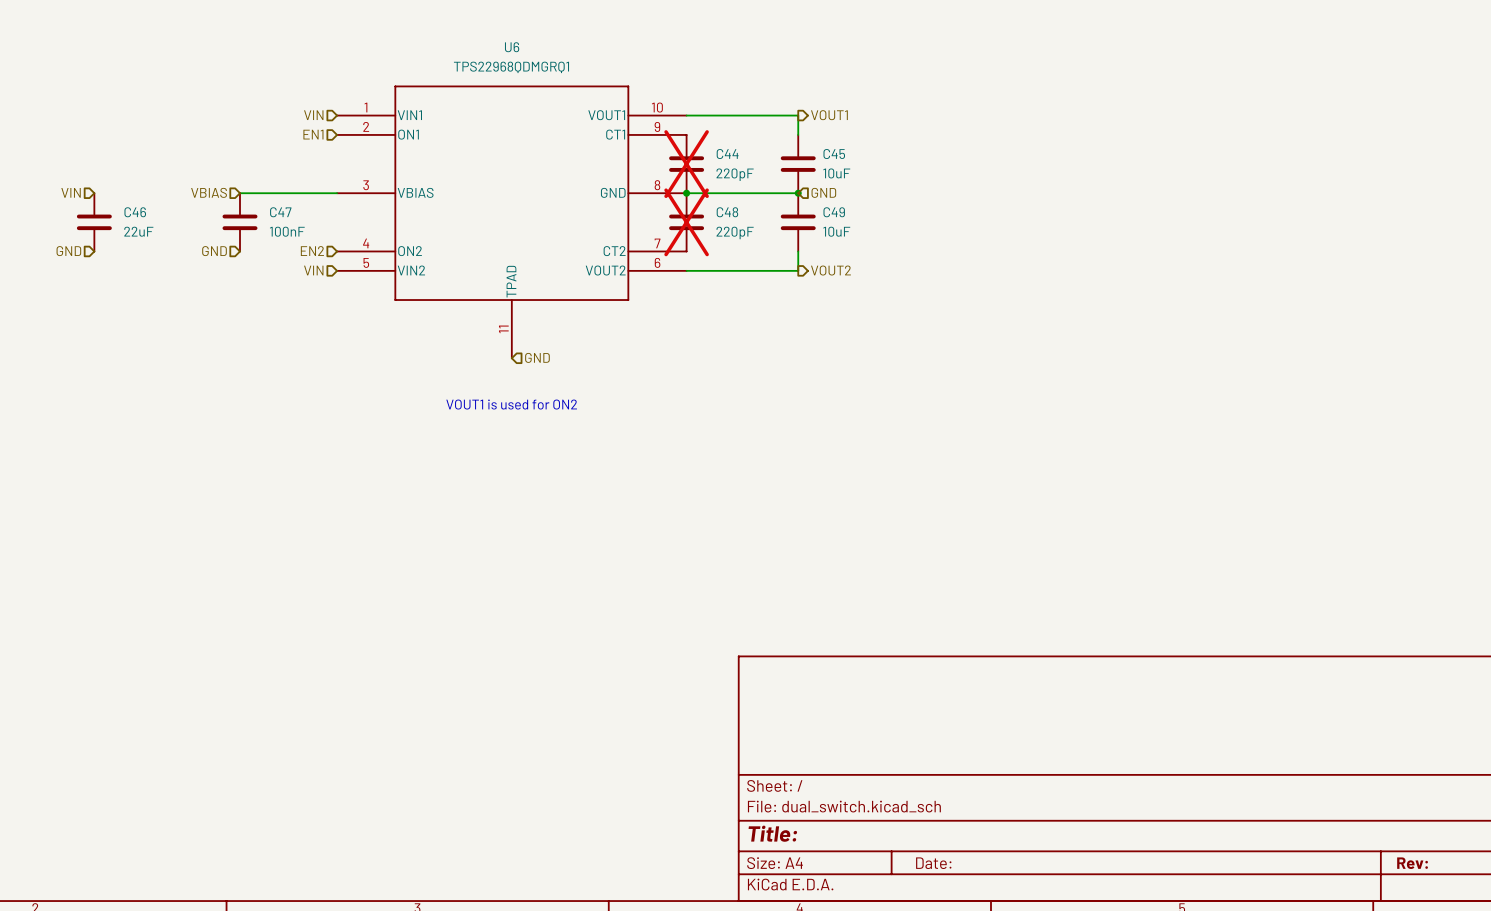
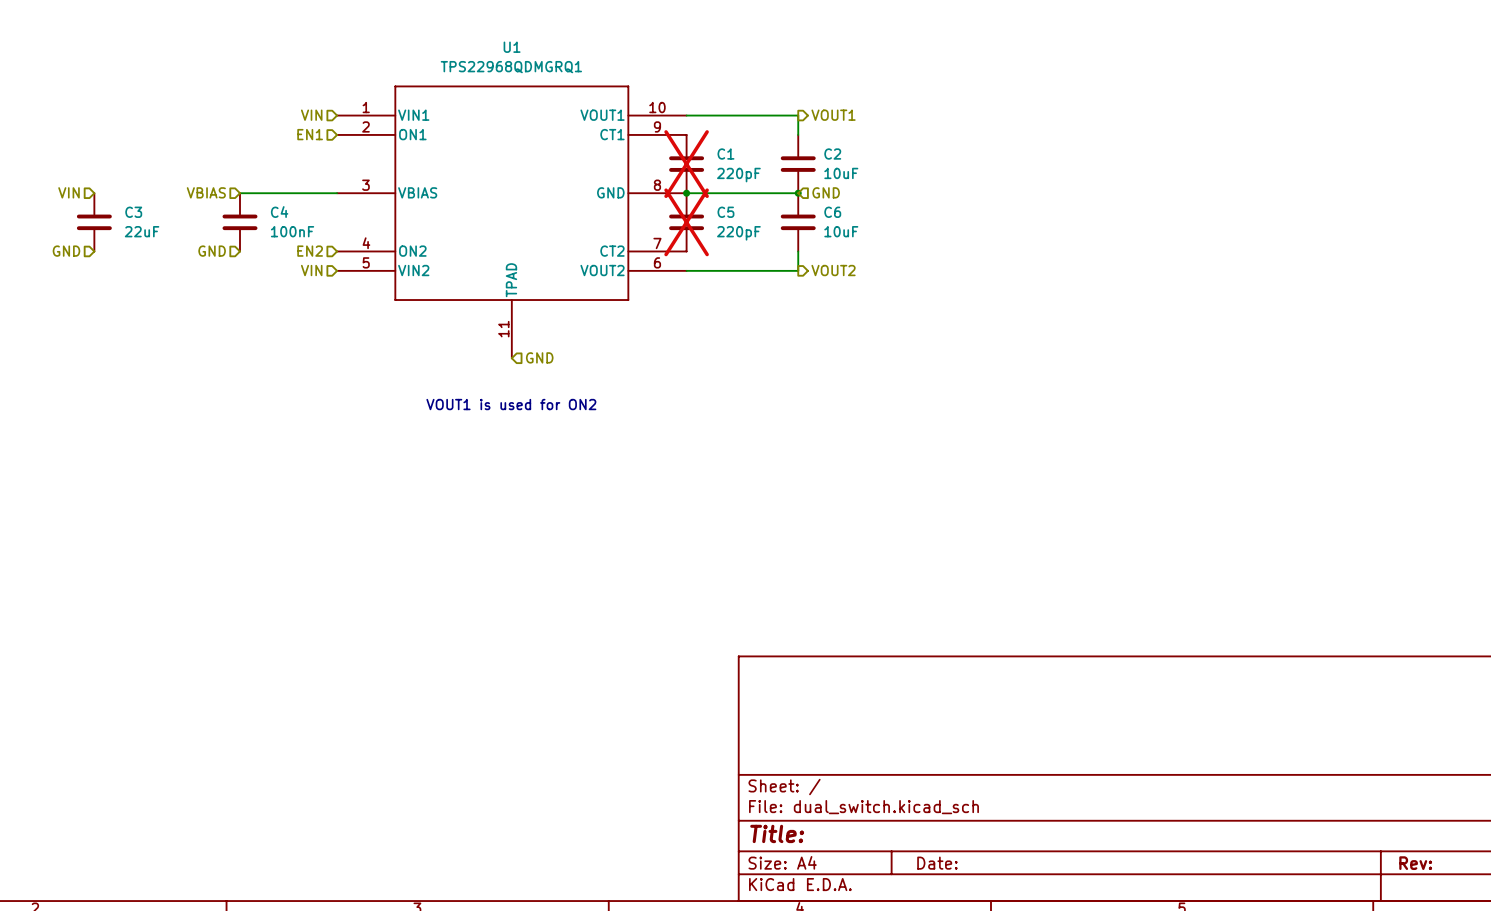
U6 name: U6 (512, 47) -> U1 (512, 47)
C44 name: C44 (727, 154) -> C1 (725, 154)
C45 name: C45 (834, 154) -> C2 (832, 154)
C46 name: C46 (135, 212) -> C3 (133, 212)
C47 name: C47 (280, 212) -> C4 (279, 212)
C48 name: C48 (727, 212) -> C5 (725, 212)
C49 name: C49 (834, 212) -> C6 (832, 212)

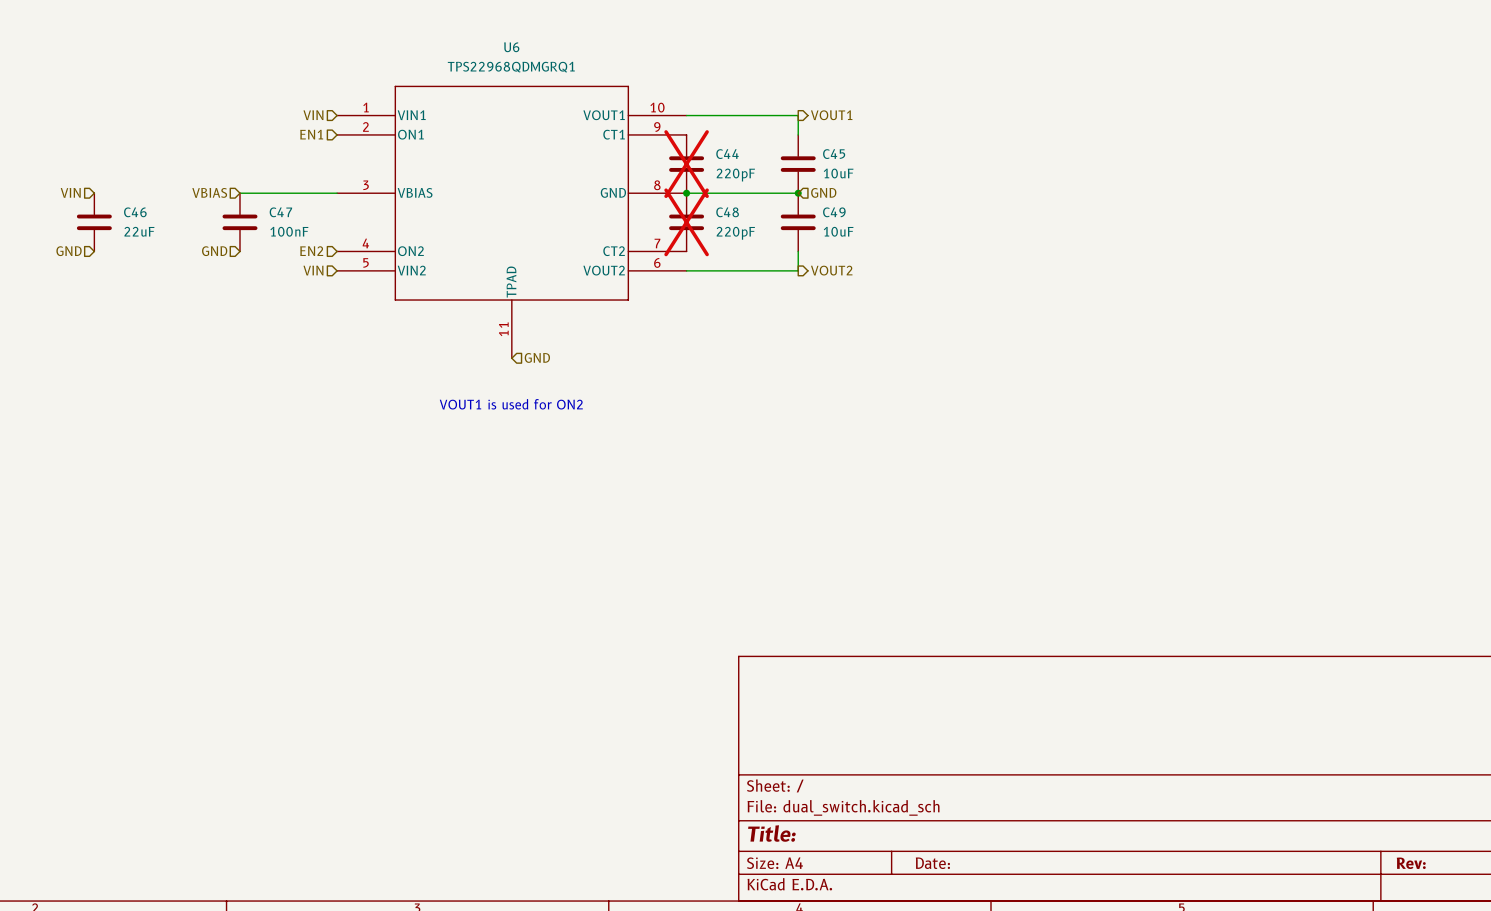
U1 name: U1 (512, 47) -> U6 (511, 47)
C1 name: C1 (725, 154) -> C44 (727, 154)
C2 name: C2 (832, 154) -> C45 (834, 154)
C3 name: C3 (133, 212) -> C46 (135, 212)
C4 name: C4 (279, 212) -> C47 (280, 212)
C5 name: C5 (725, 212) -> C48 (727, 212)
C6 name: C6 (832, 212) -> C49 (834, 212)

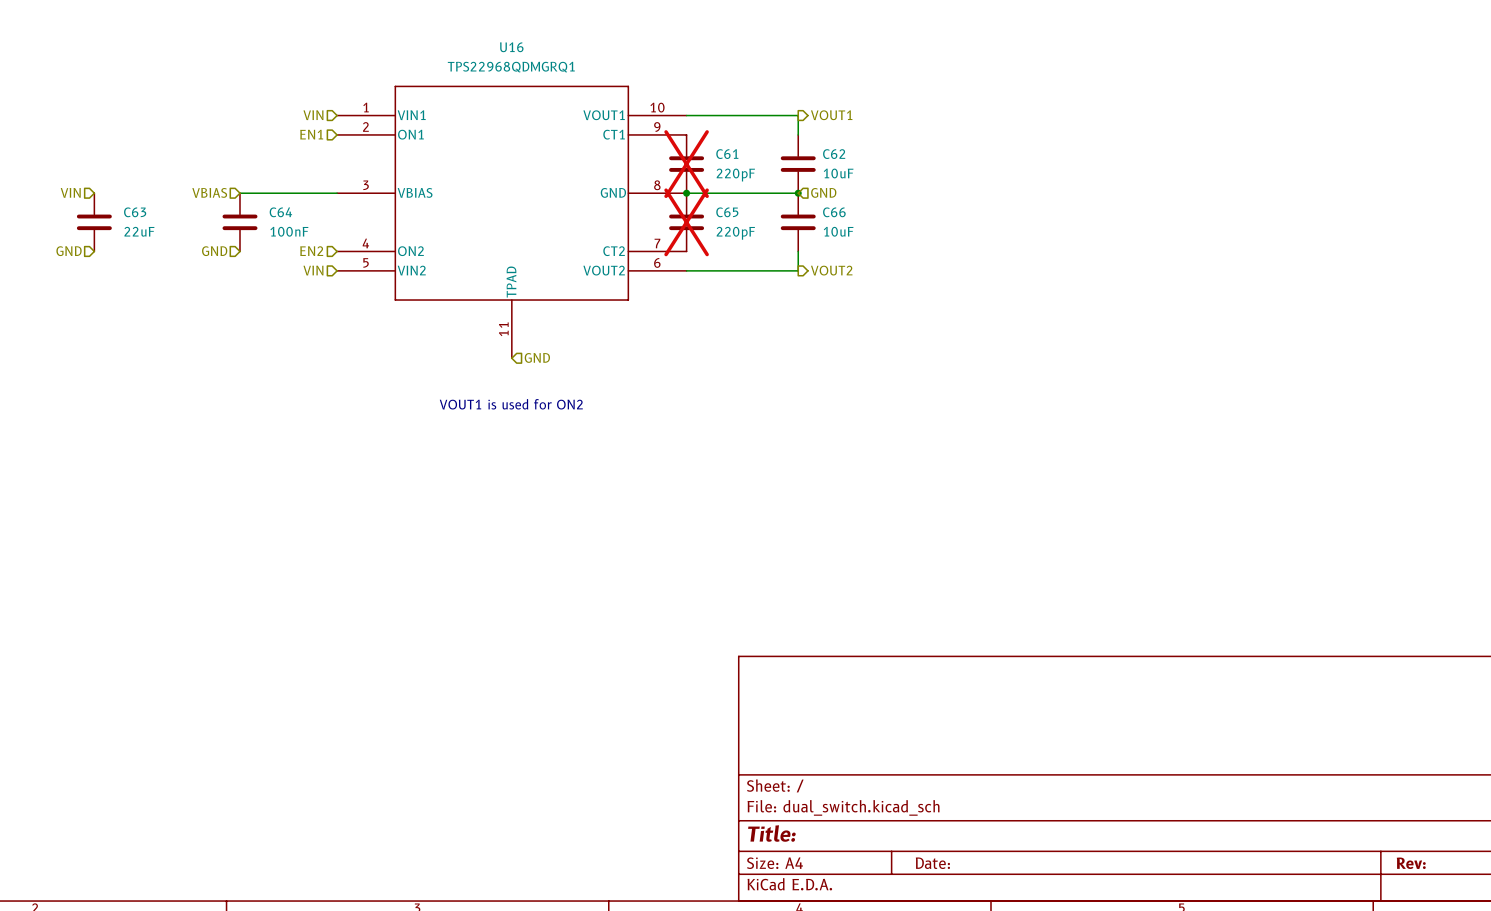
U6 name: U6 (511, 47) -> U16 (511, 47)
C44 name: C44 (727, 154) -> C61 (727, 154)
C45 name: C45 (834, 154) -> C62 (834, 154)
C46 name: C46 (135, 212) -> C63 (135, 212)
C47 name: C47 (280, 212) -> C64 (280, 212)
C48 name: C48 (727, 212) -> C65 (727, 212)
C49 name: C49 (834, 212) -> C66 (834, 212)

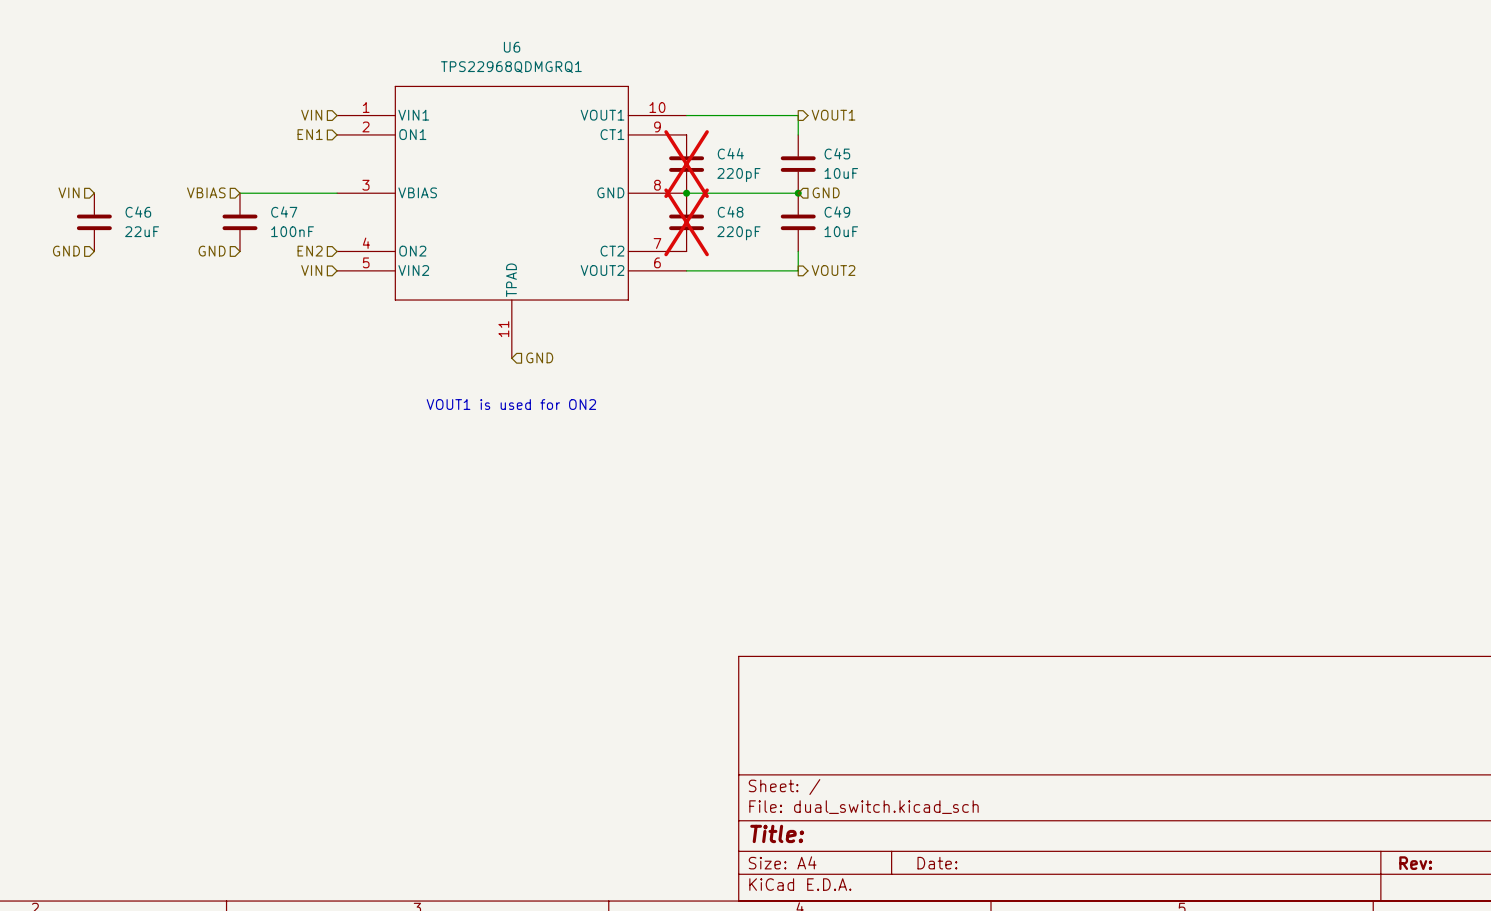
U16 name: U16 (511, 47) -> U6 (512, 47)
C61 name: C61 (727, 154) -> C44 (730, 153)
C62 name: C62 (834, 154) -> C45 (837, 153)
C63 name: C63 (135, 212) -> C46 (138, 212)
C64 name: C64 (280, 212) -> C47 (284, 212)
C65 name: C65 (727, 212) -> C48 (730, 212)
C66 name: C66 (834, 212) -> C49 (837, 212)

